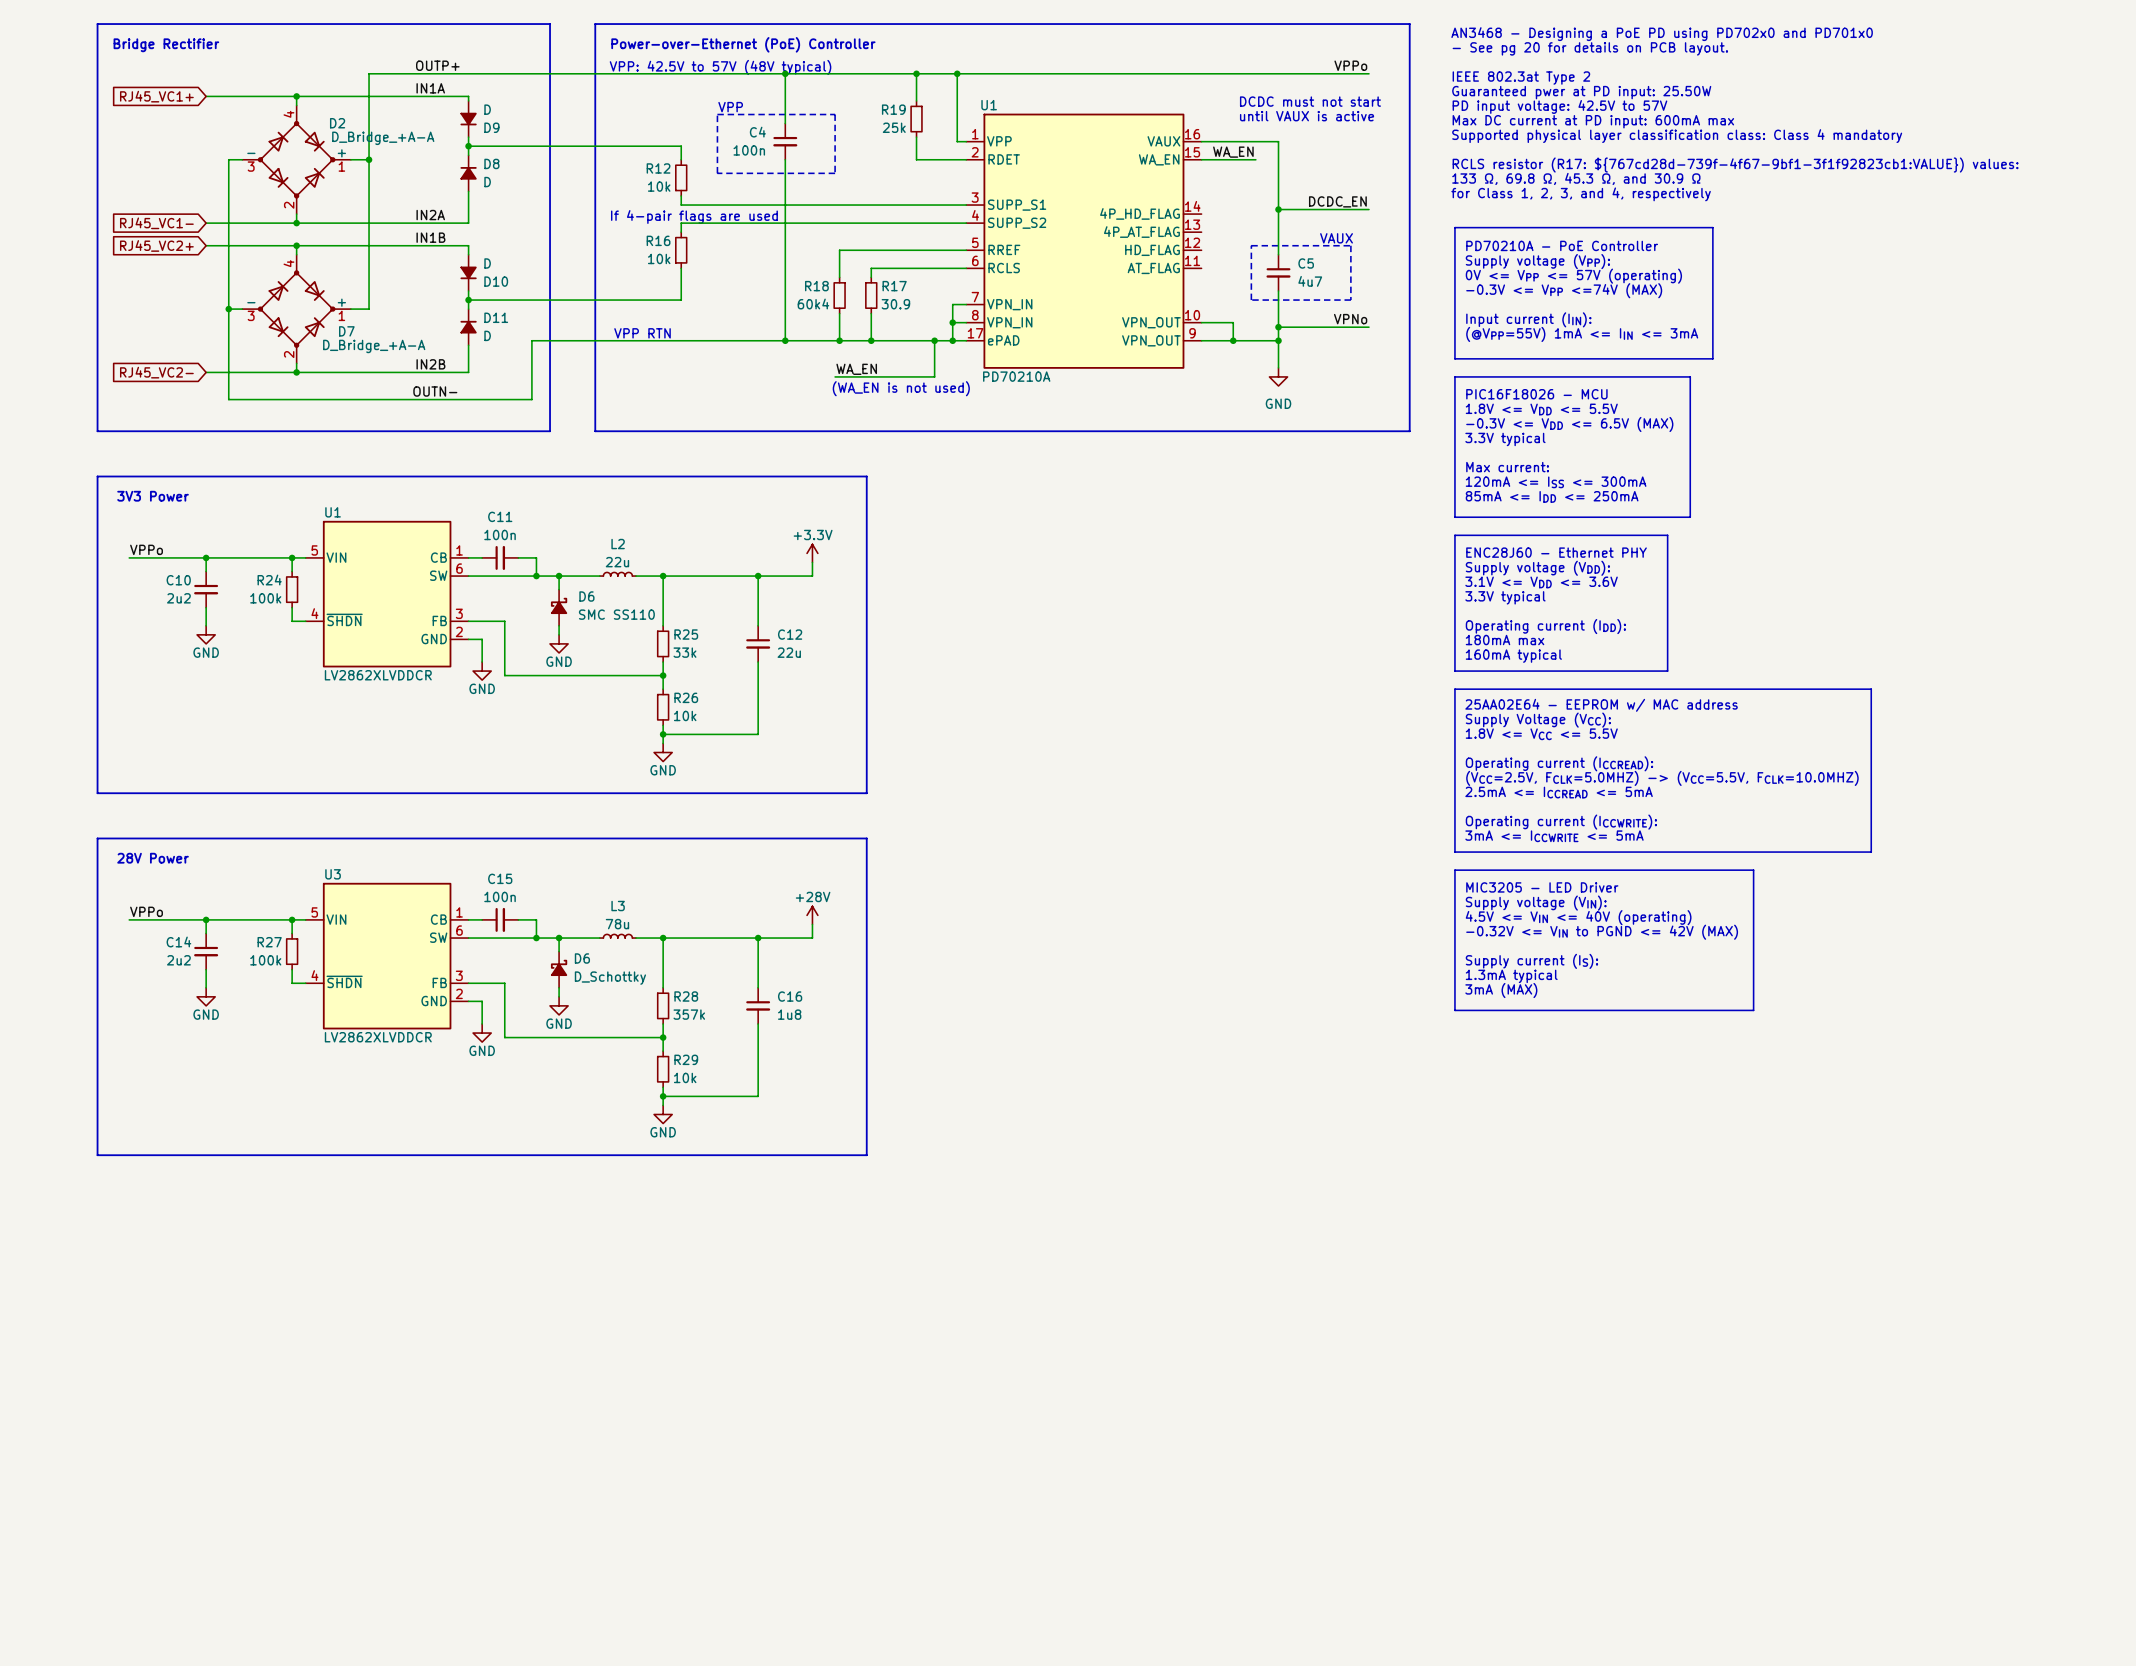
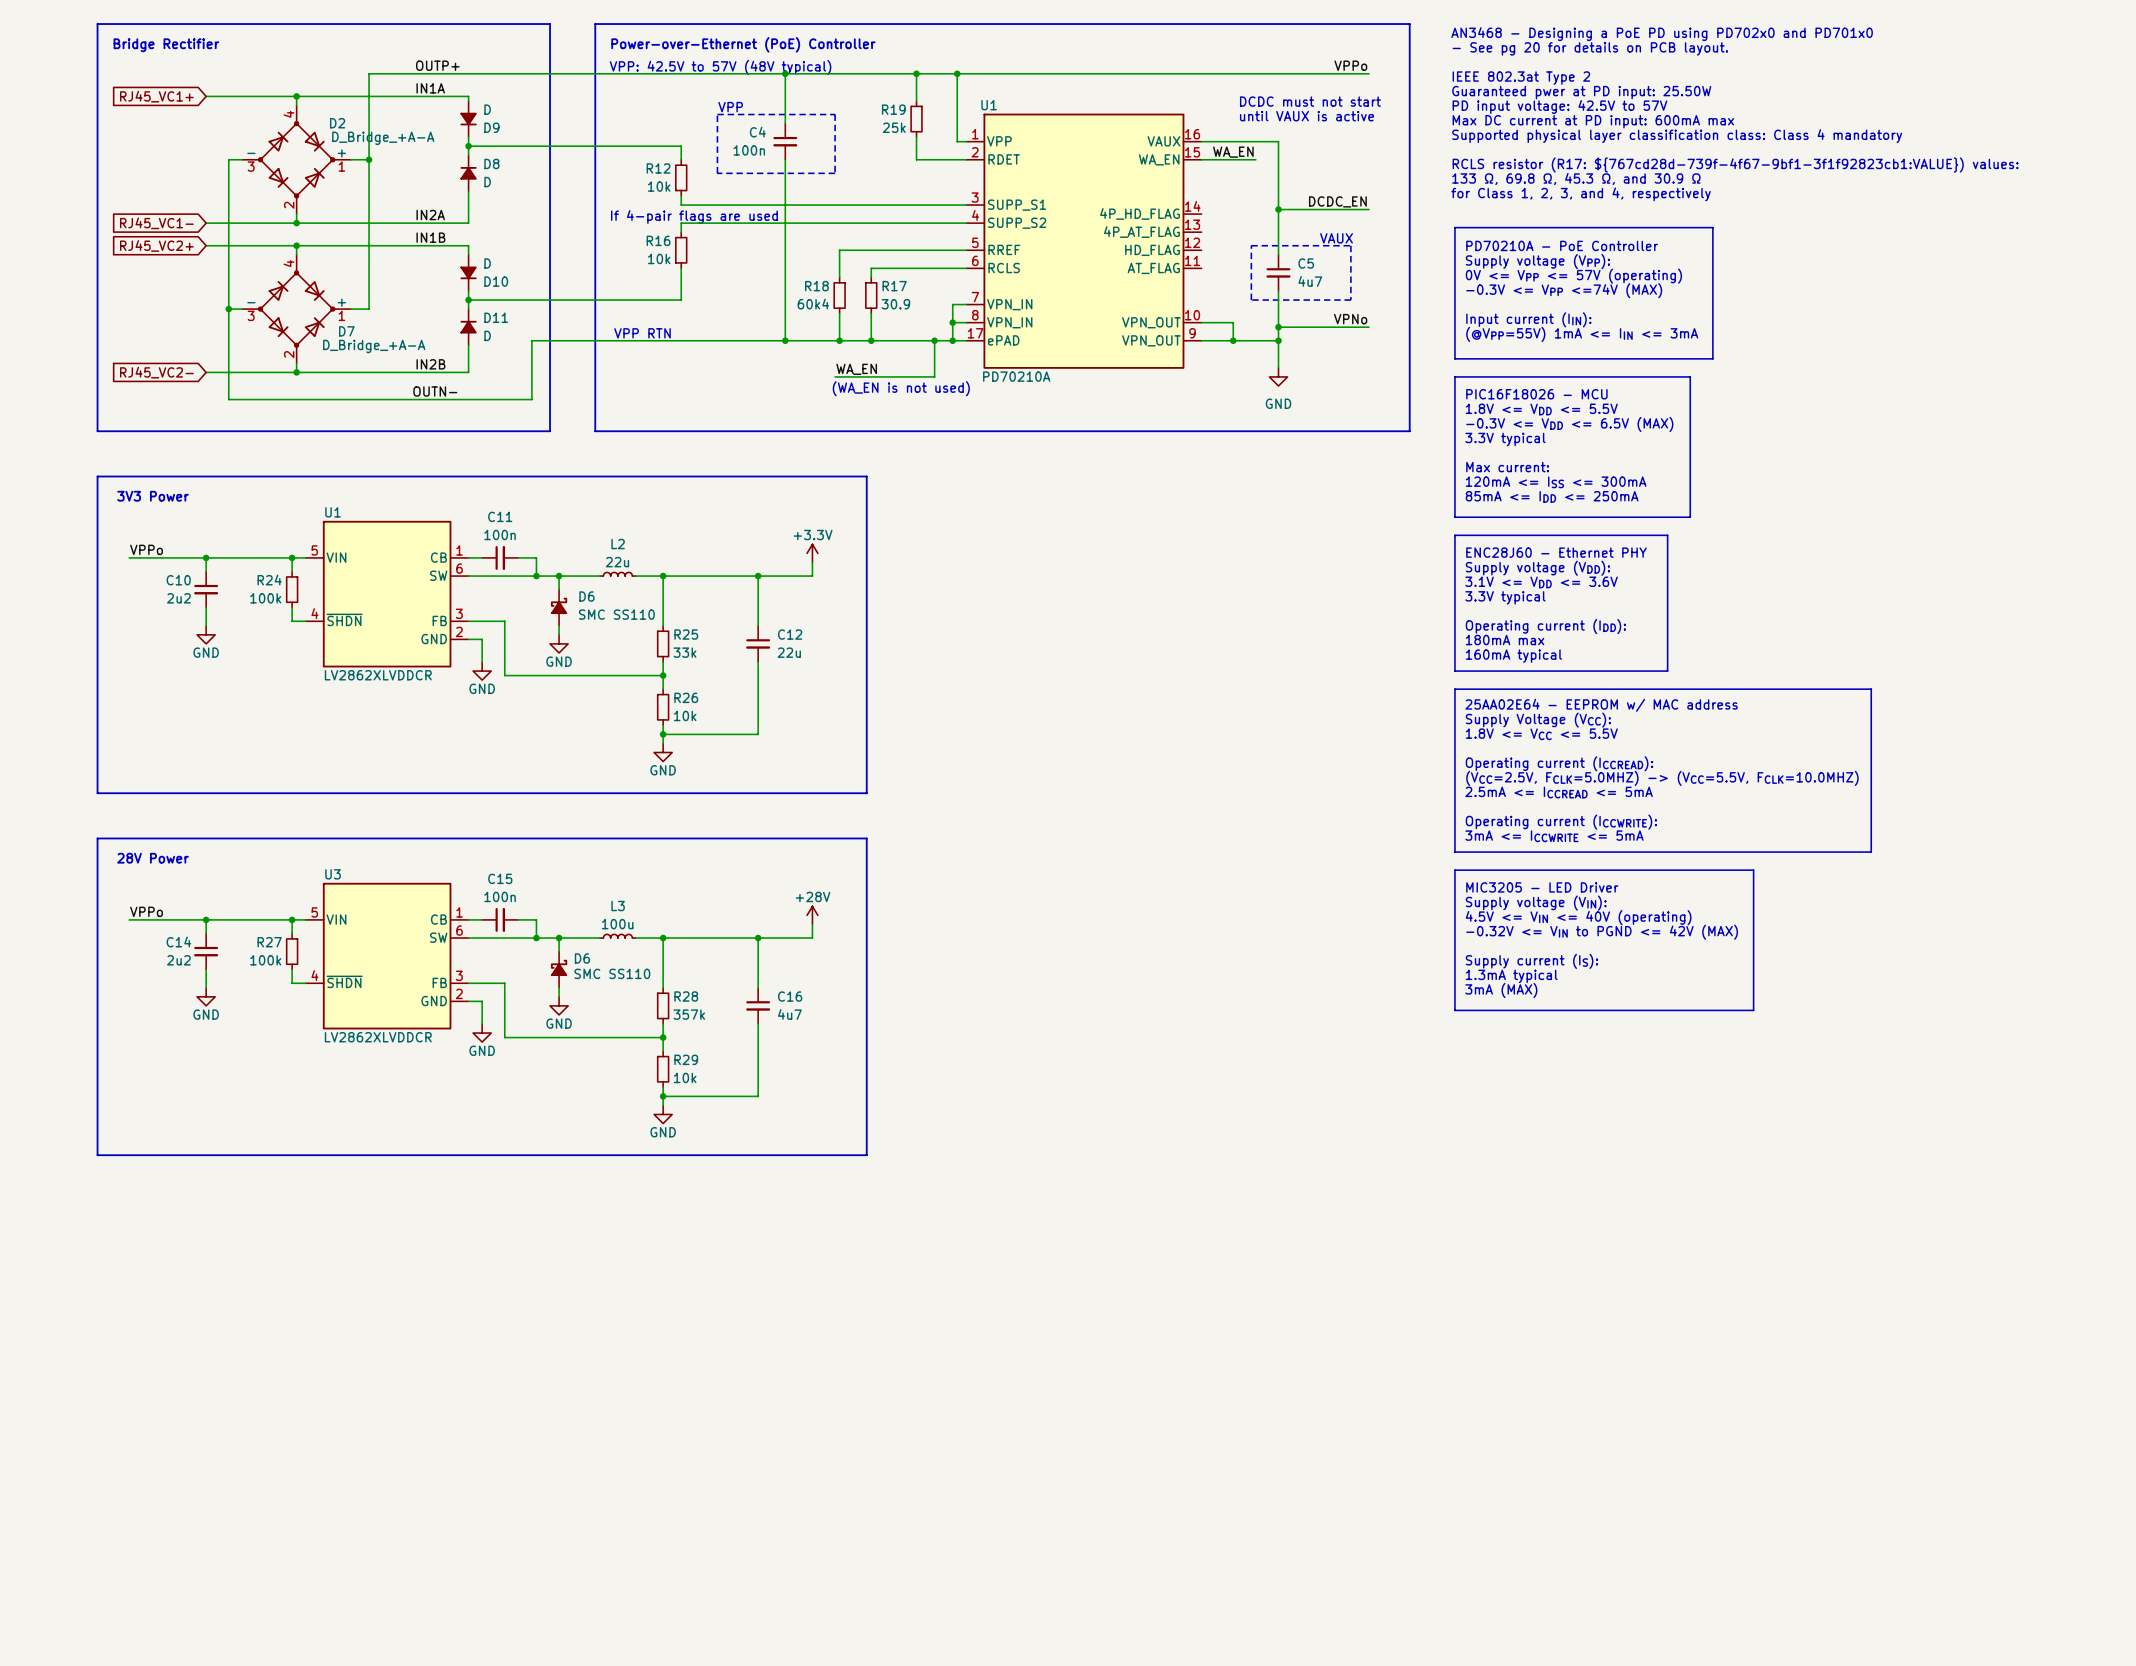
L3 value: 78u (617, 924) -> 100u (617, 924)
D6 value: D_Schottky (610, 978) -> SMC SS110 (612, 973)
C16 value: 1u8 (789, 1014) -> 4u7 (789, 1014)

